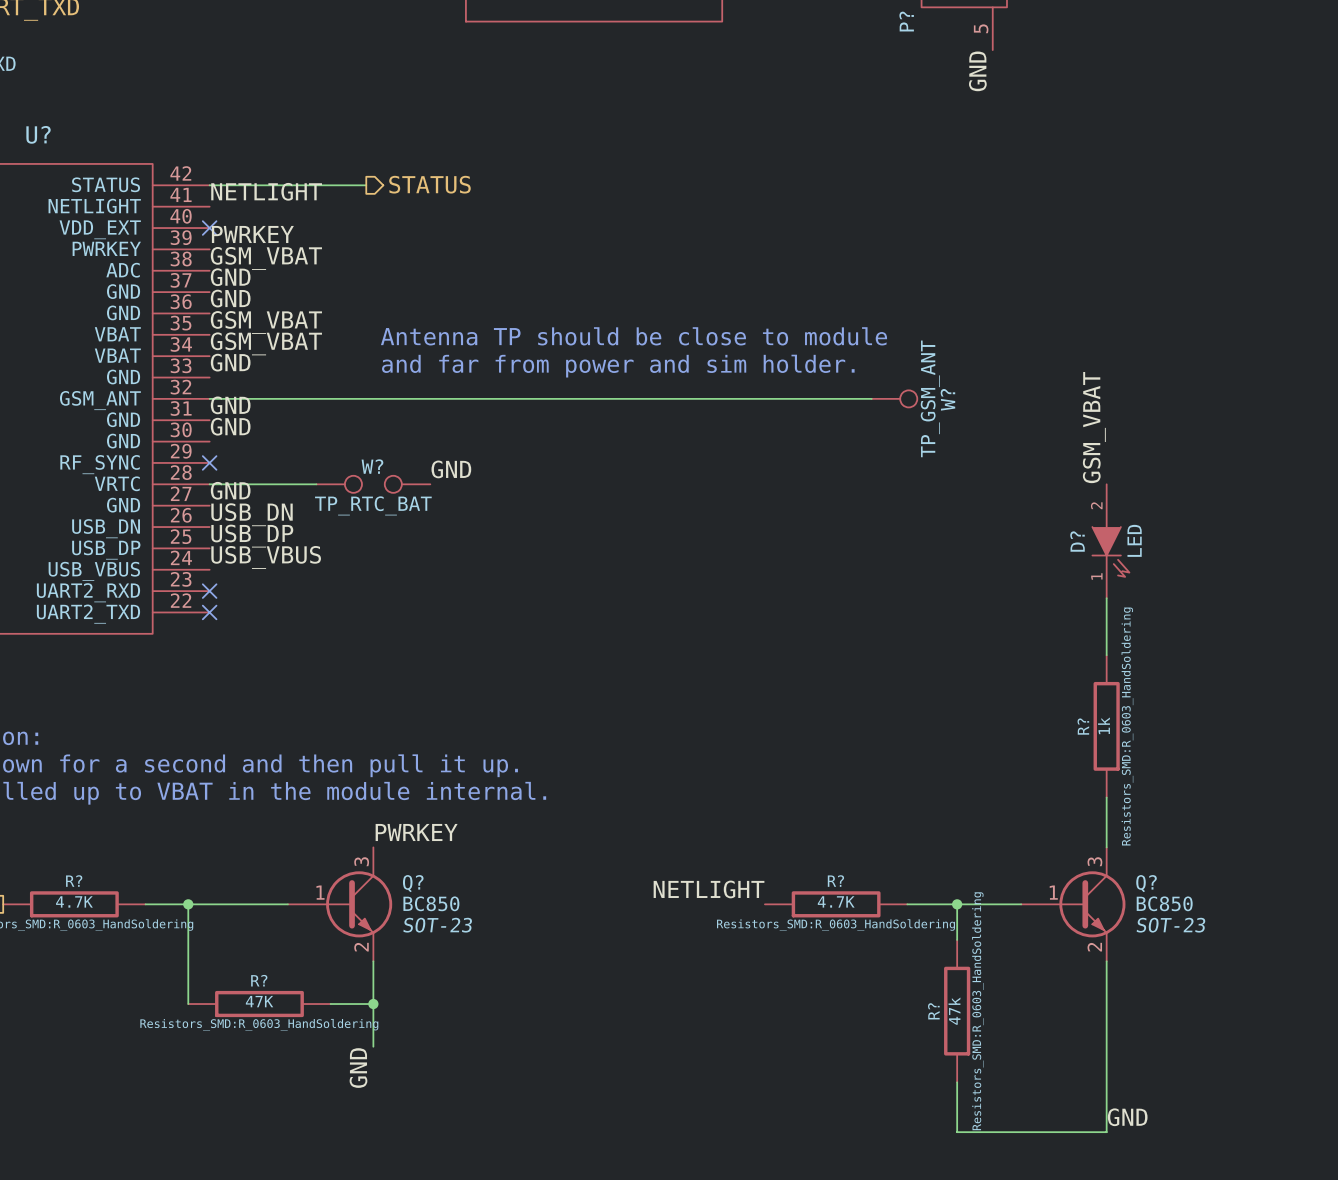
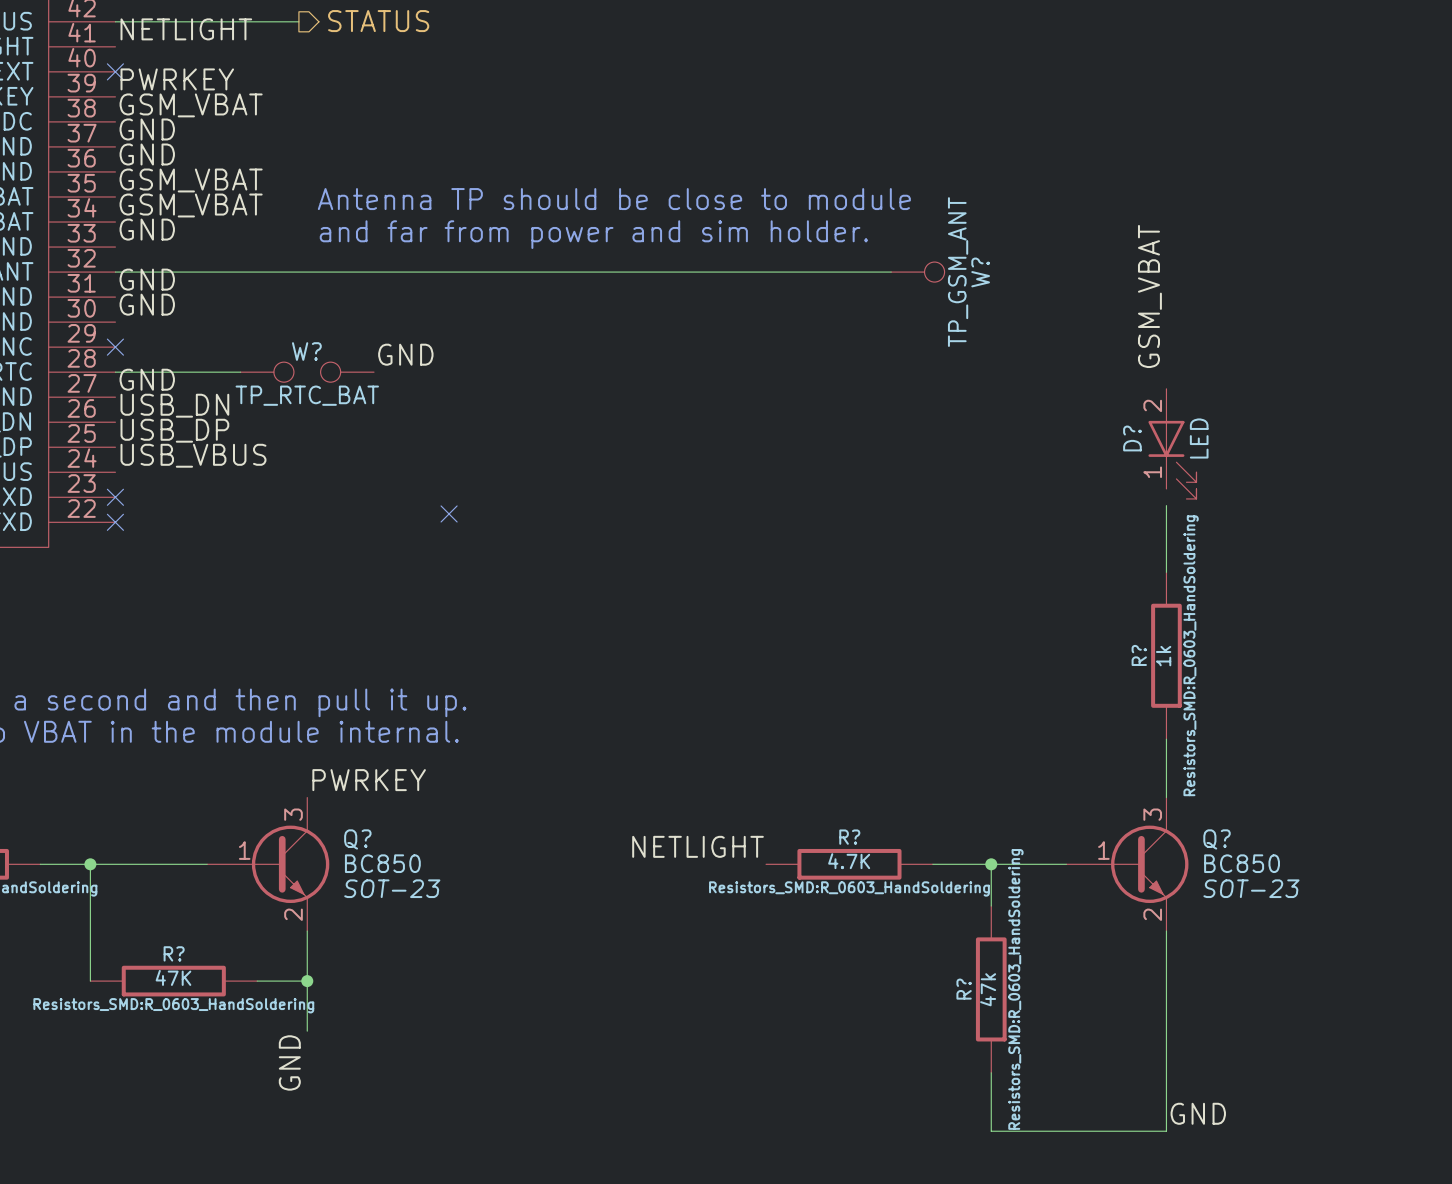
D? symbol: [1092, 484, 1130, 599] -> [1148, 388, 1197, 499]
no-connect mark: none -> (449, 513)

